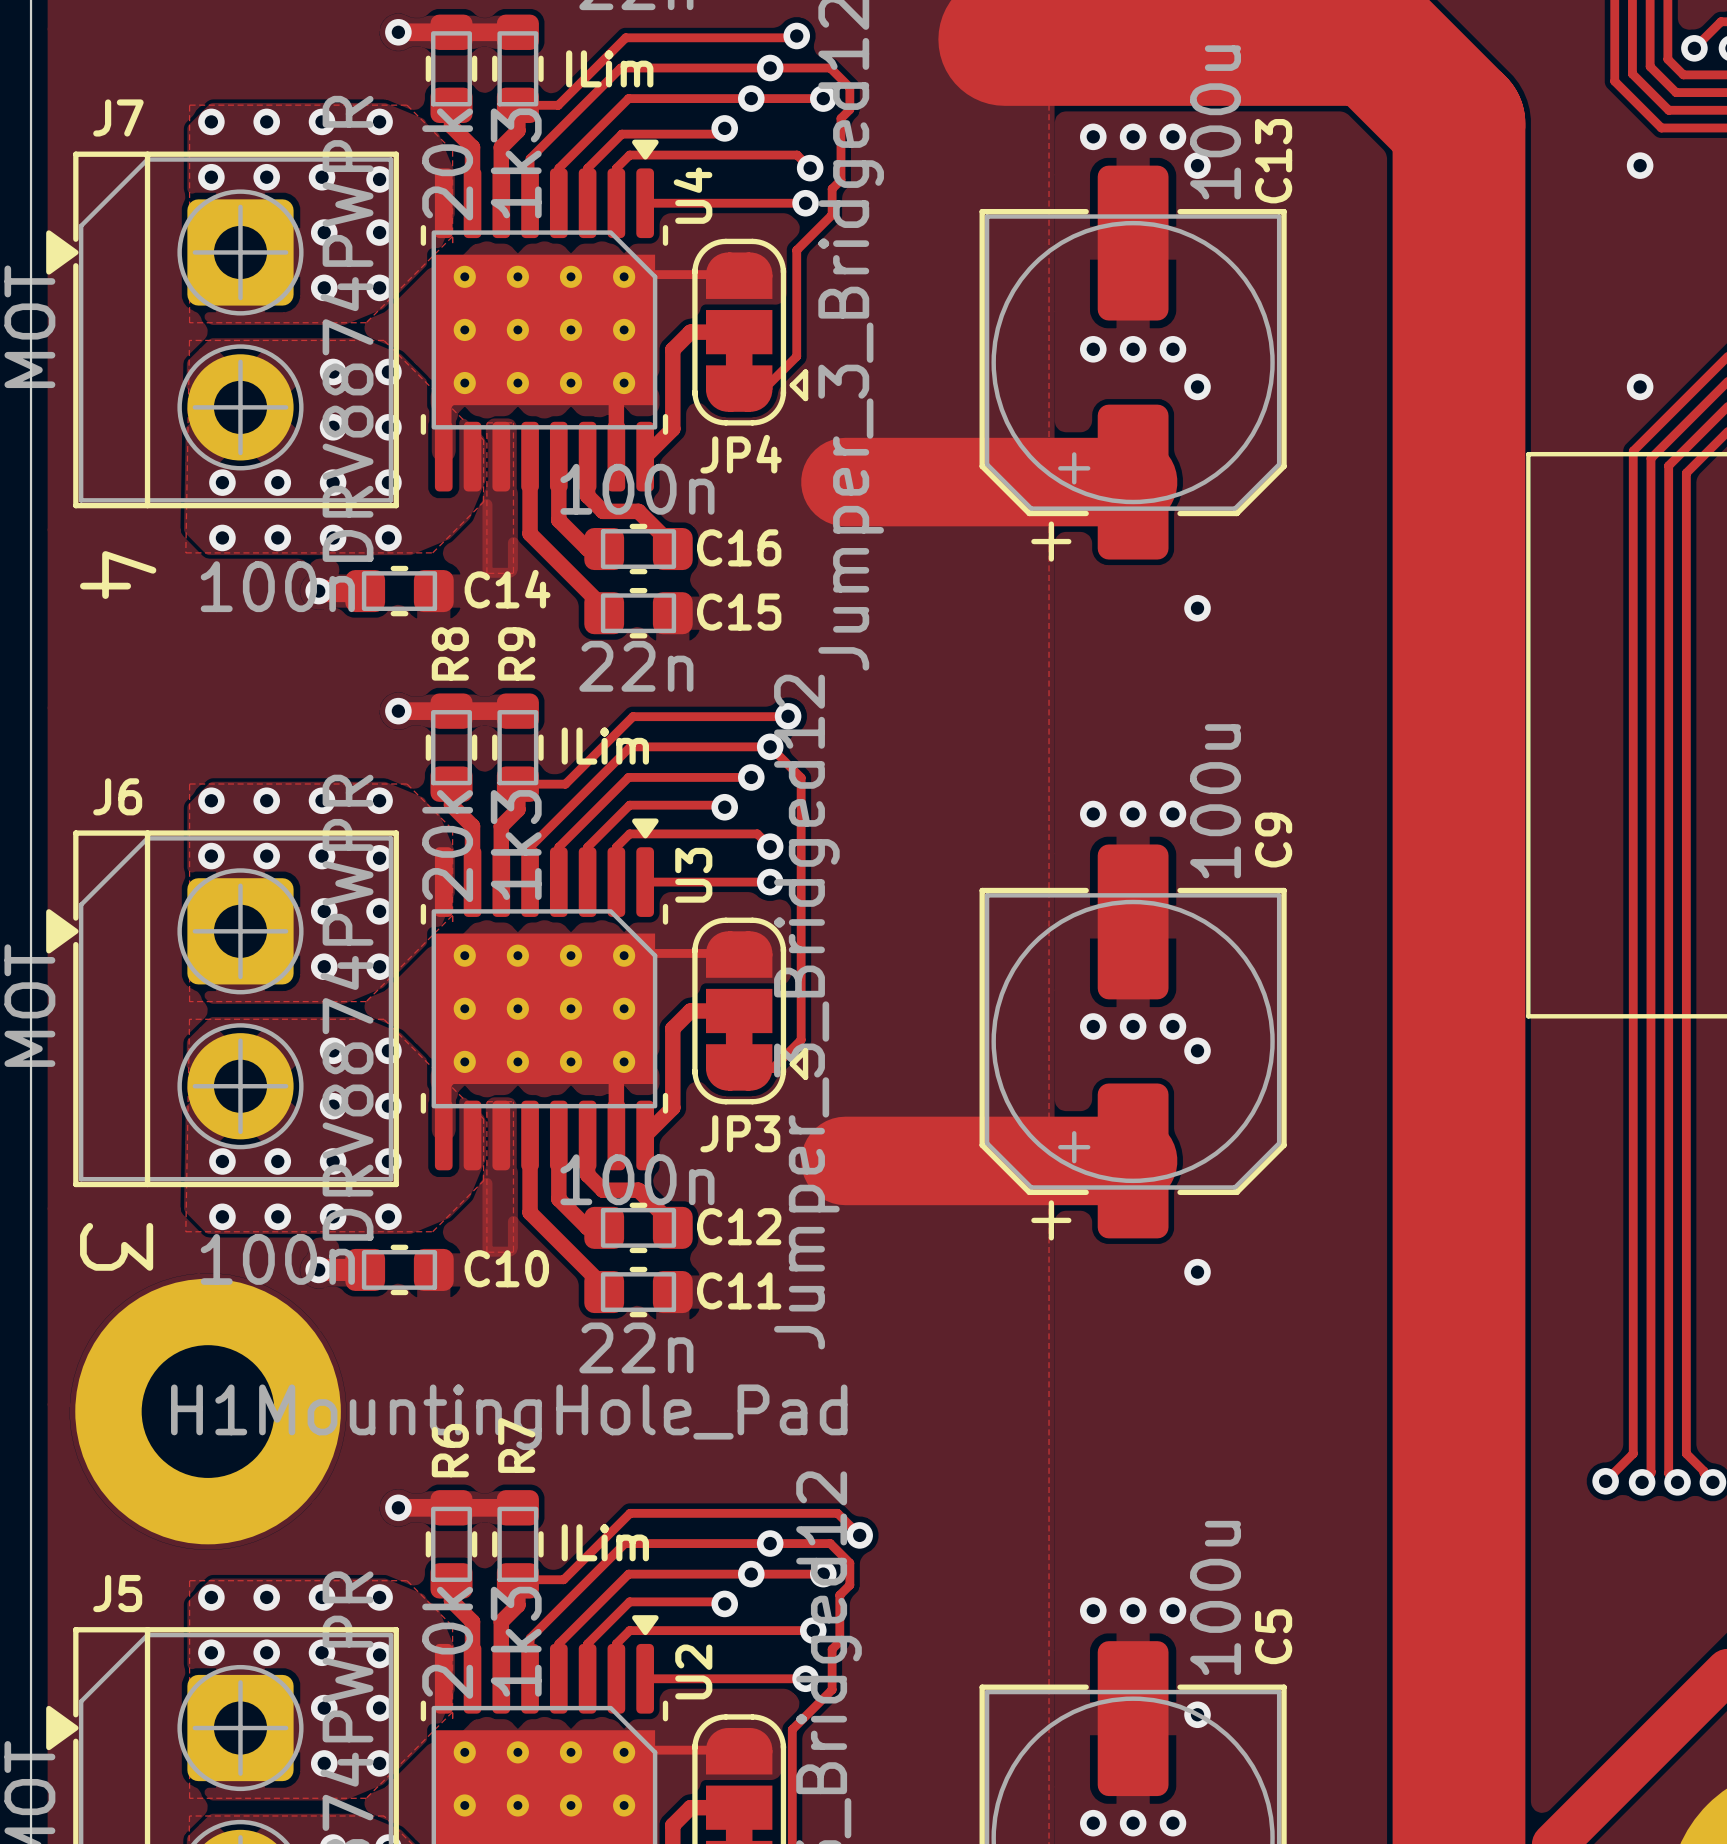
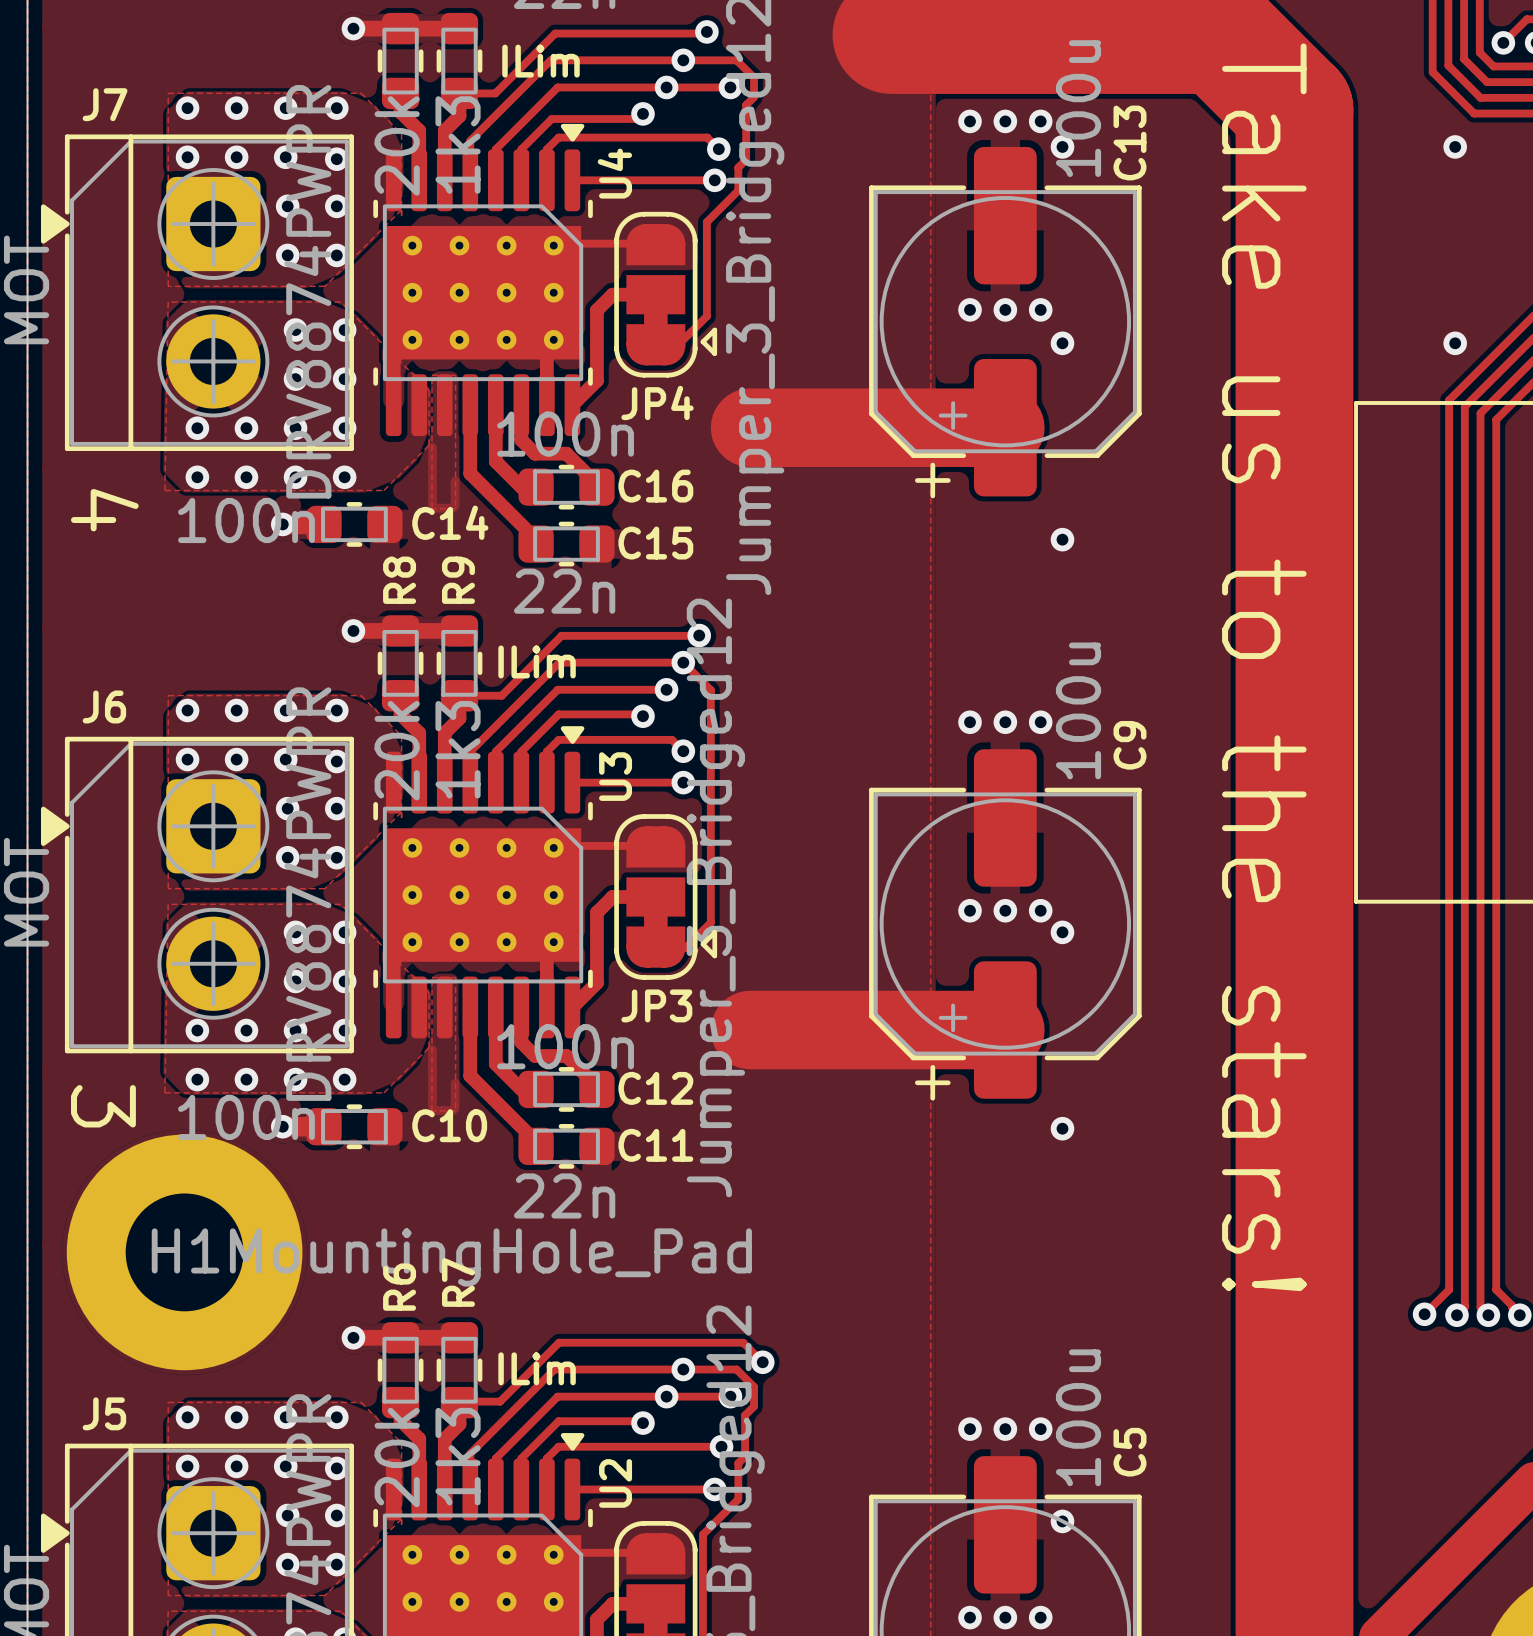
text: none -> Take us to the stars! (1264, 667)

